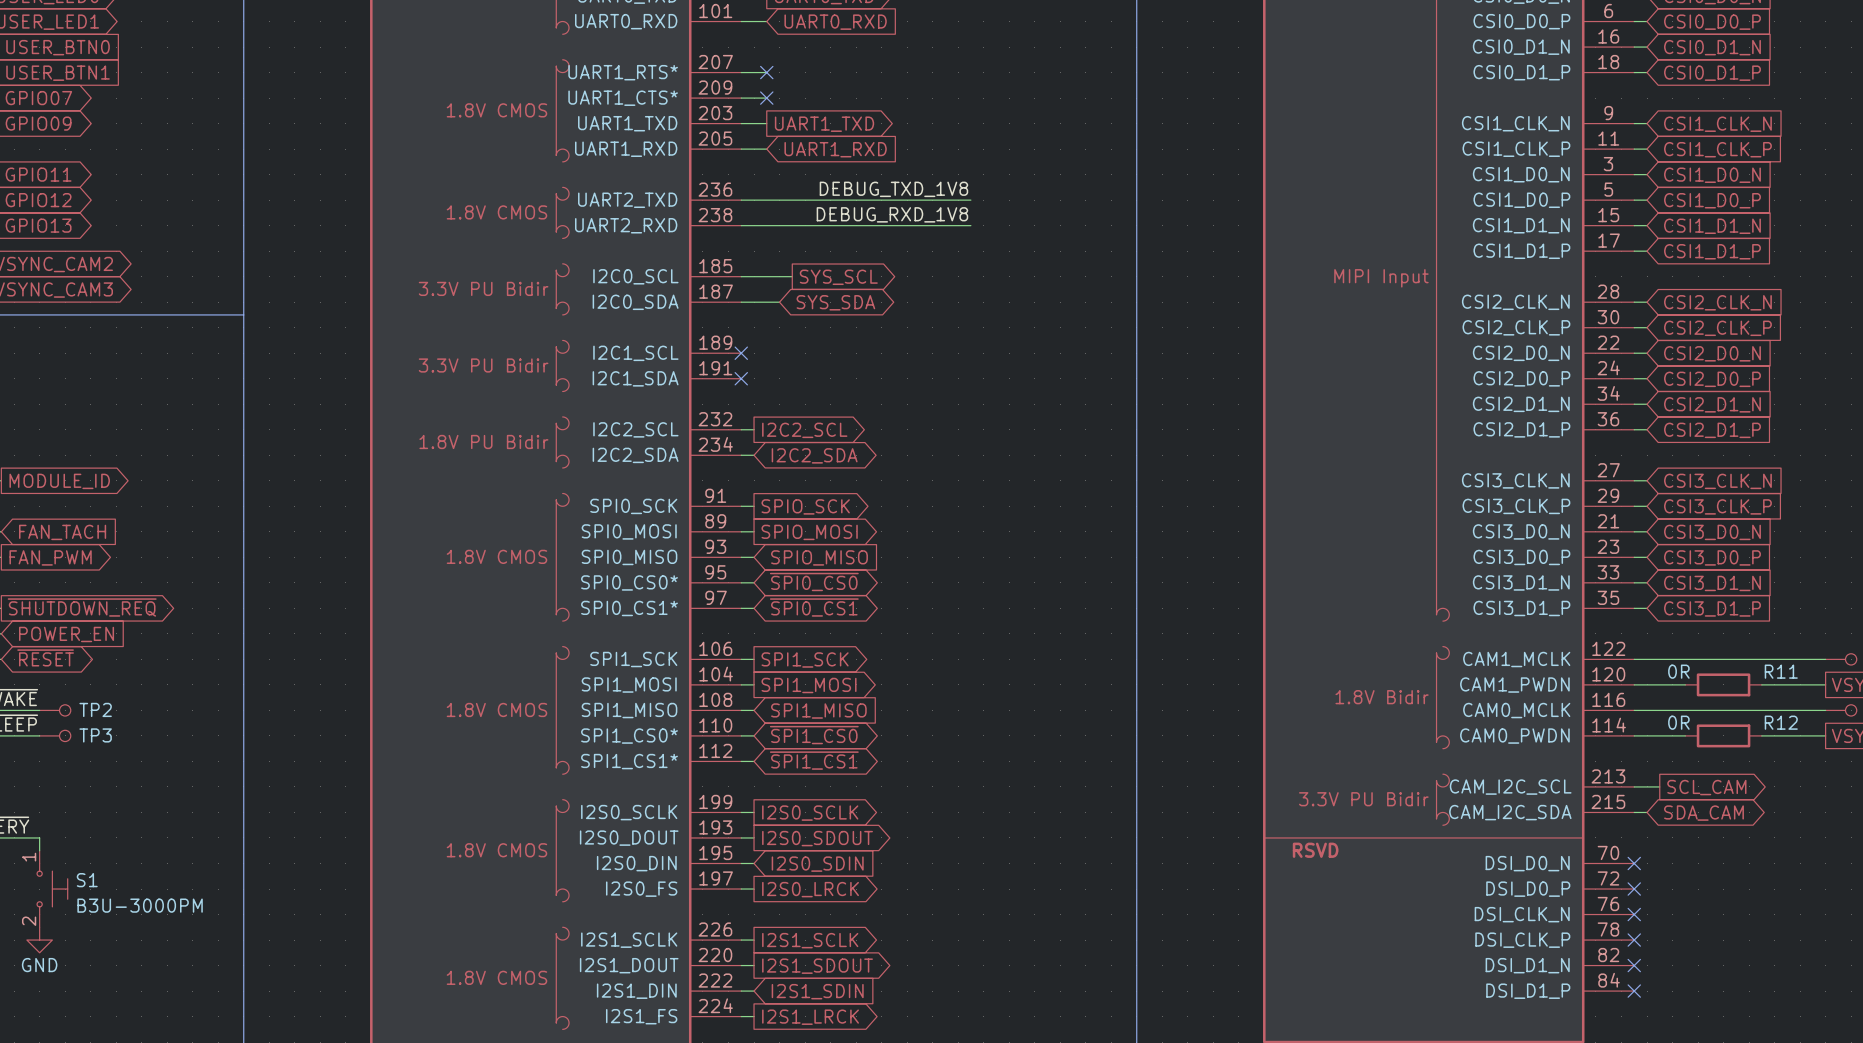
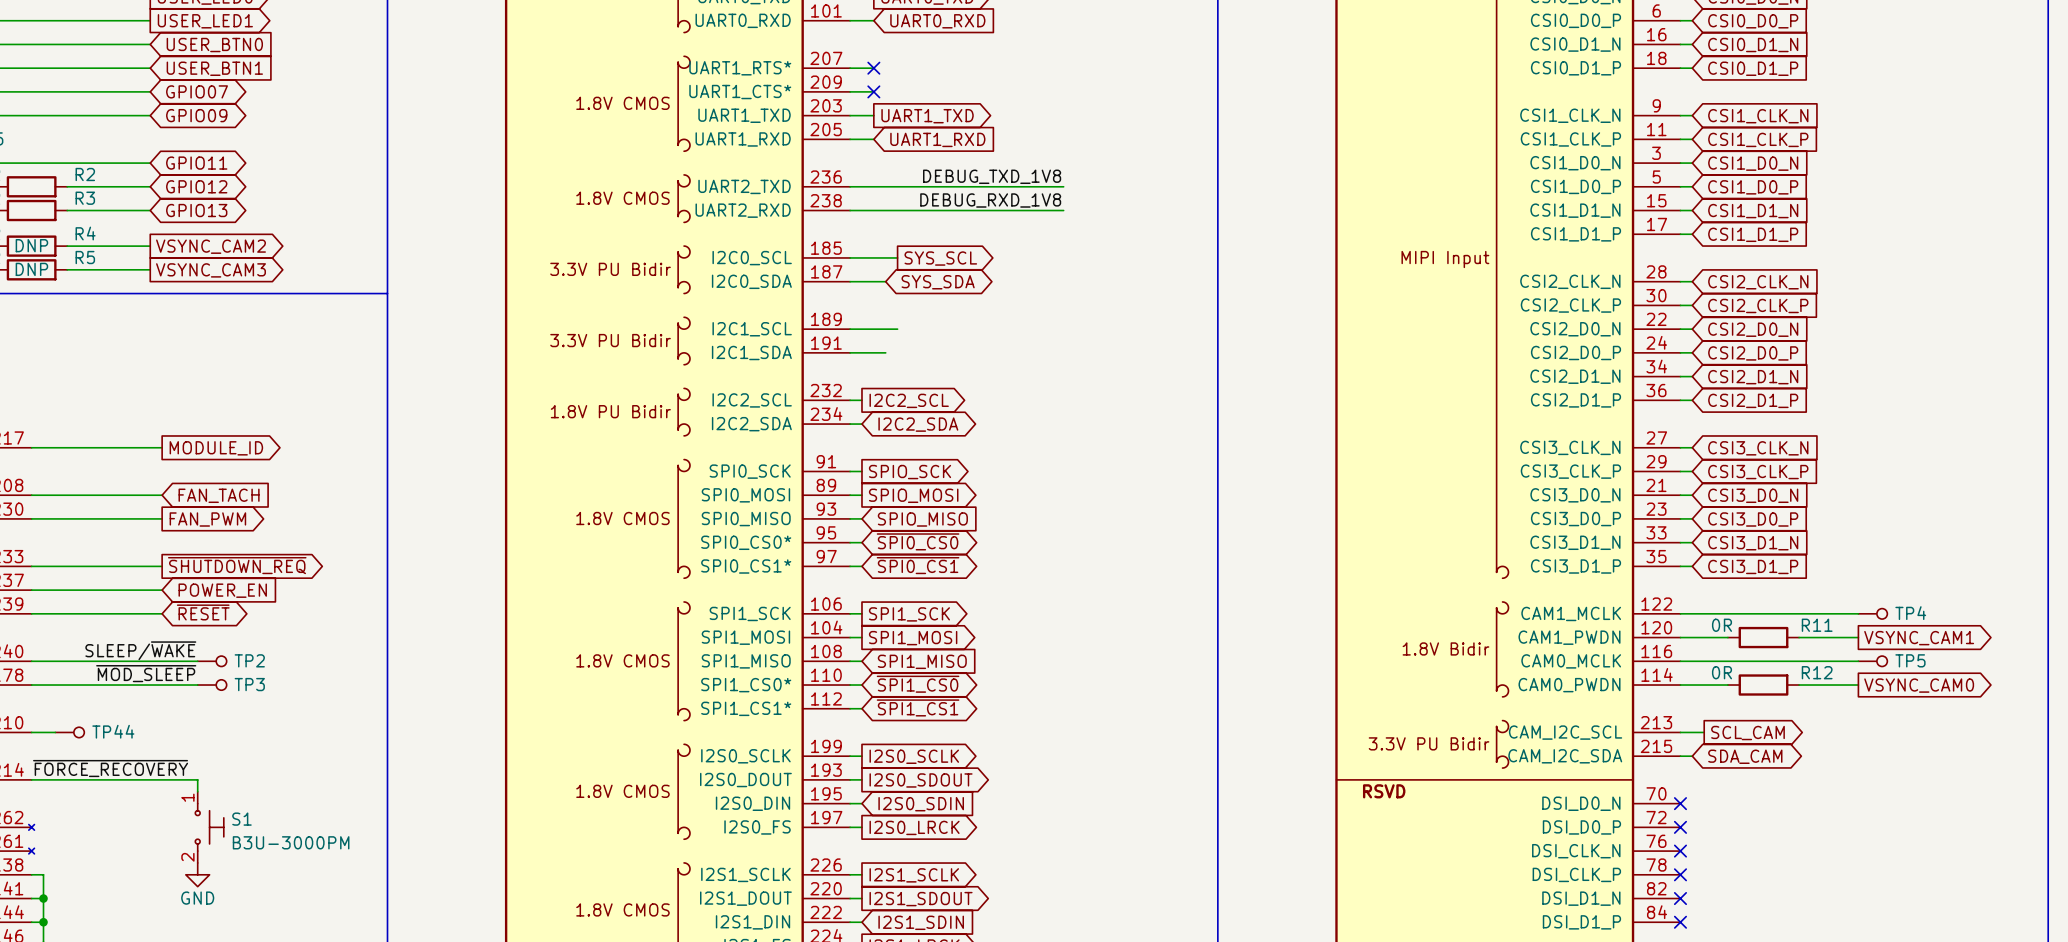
wire: none -> (850, 329) (897, 329)
no-connect mark: (741, 353) -> none
wire: none -> (850, 352) (885, 352)
no-connect mark: (741, 378) -> none

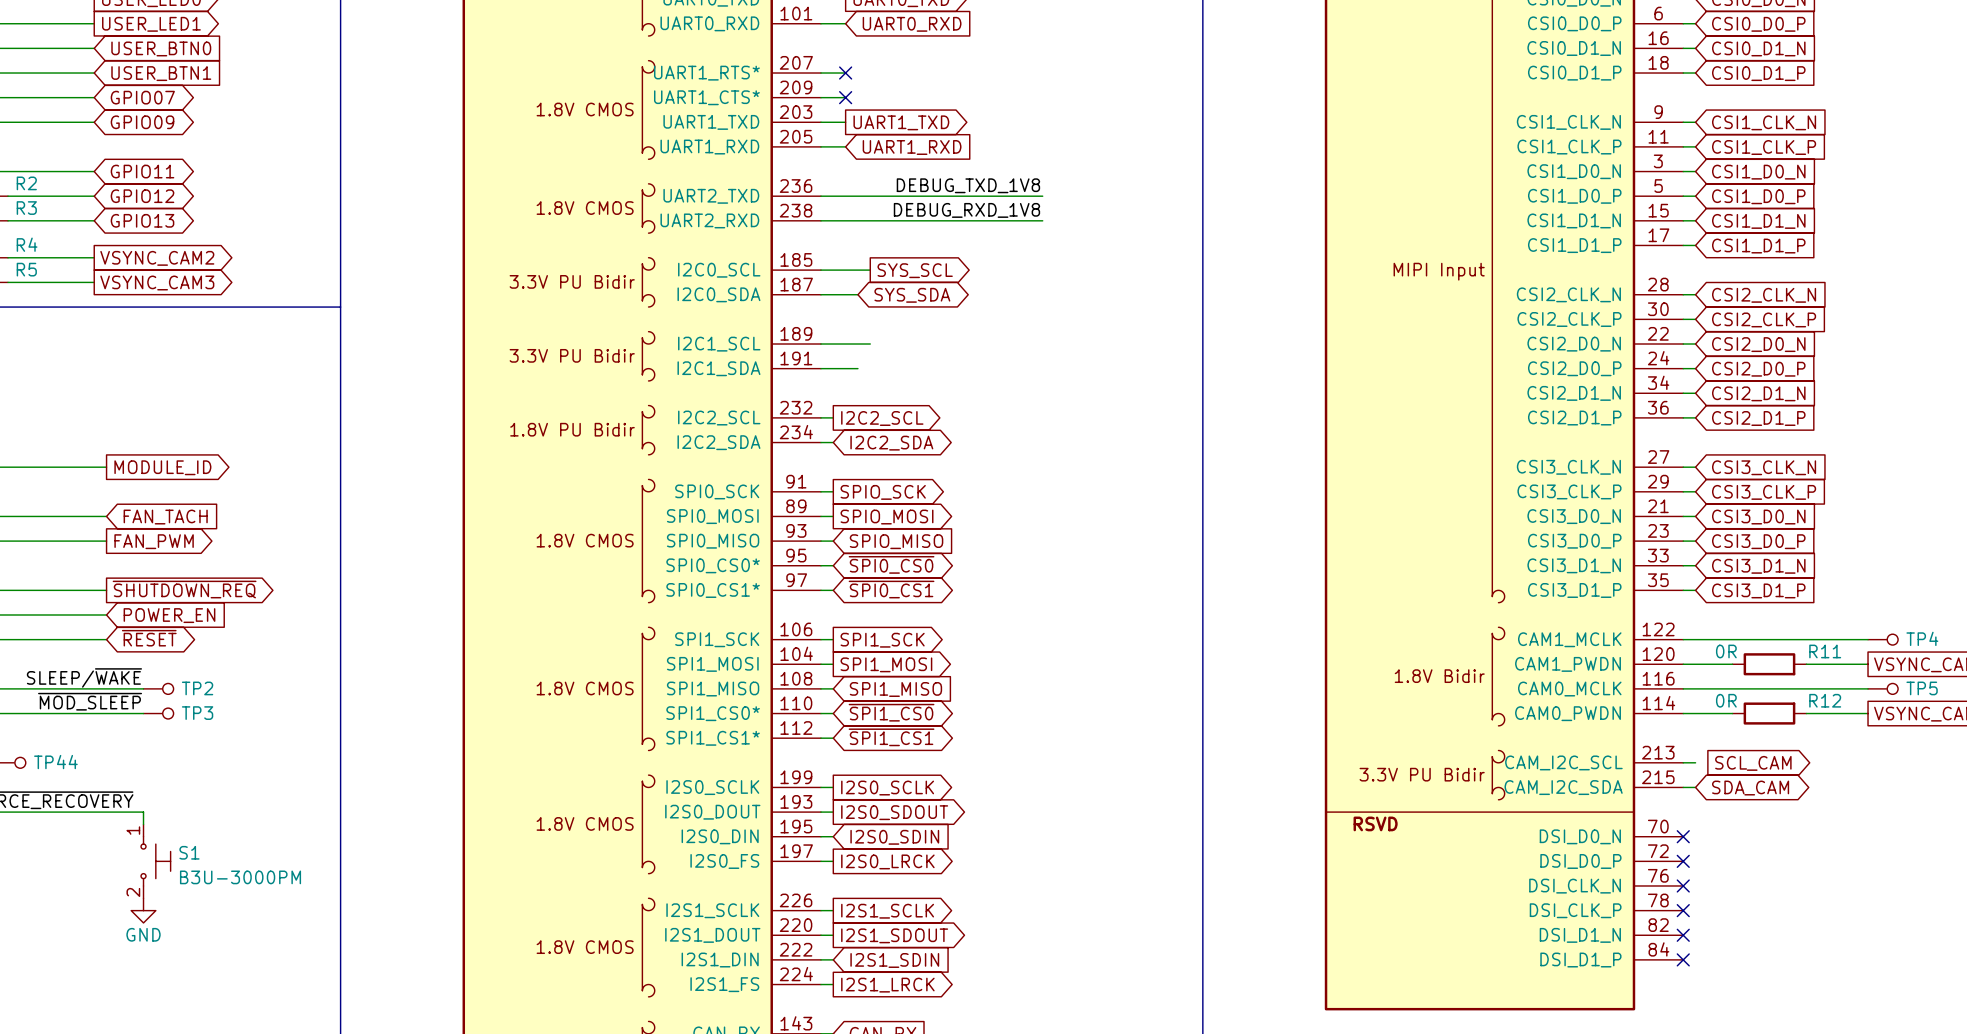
wire: (1692, 732) (1704, 732) -> none

